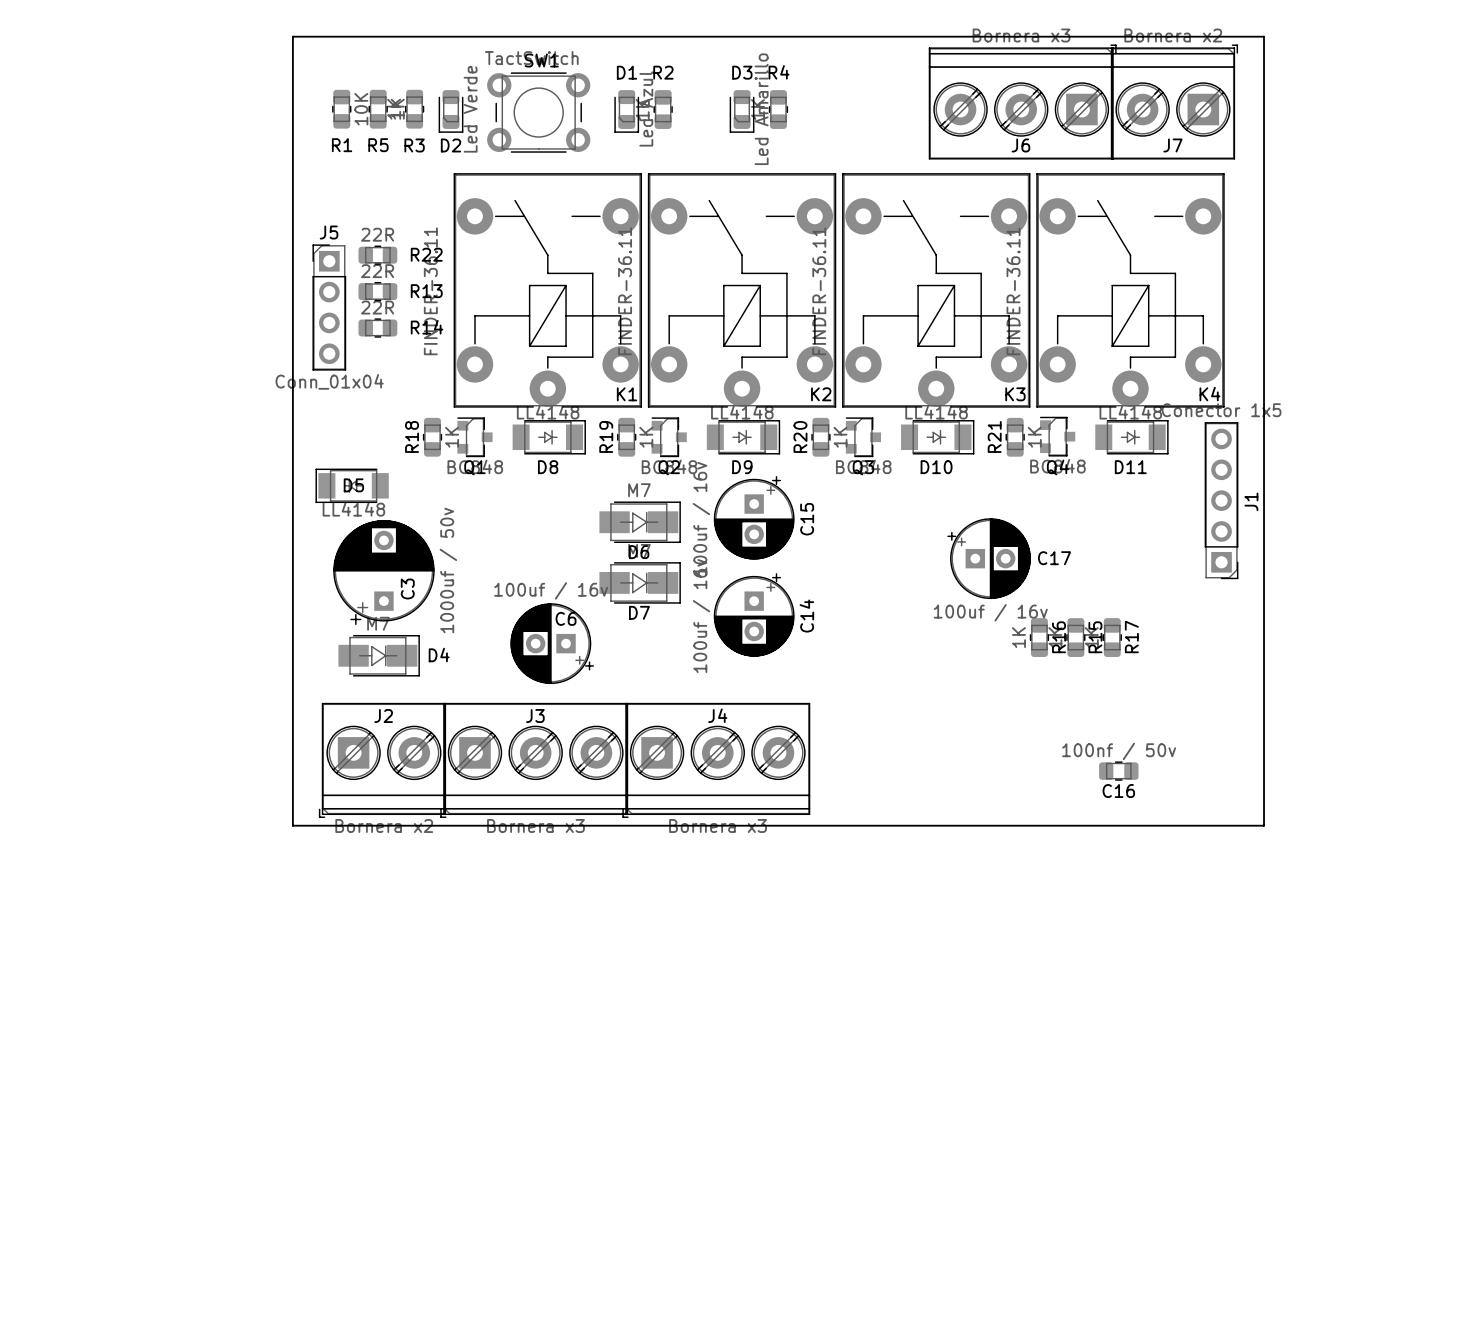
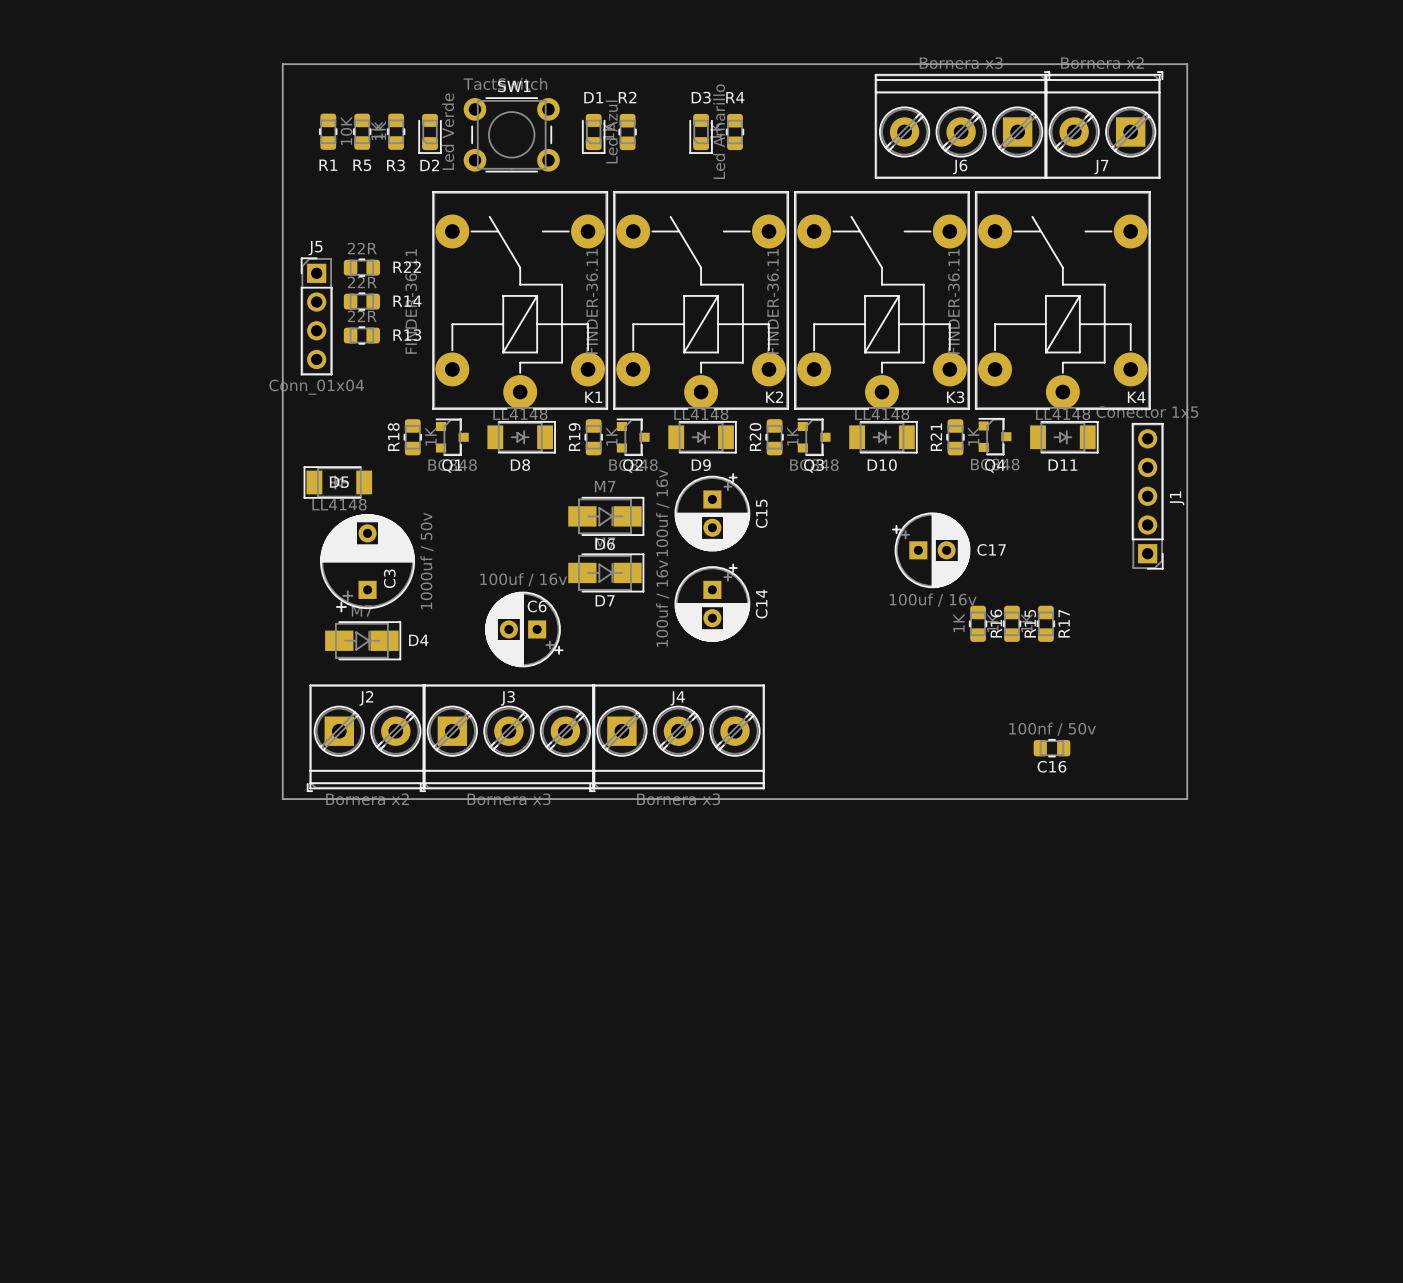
R13 name: R13 (426, 291) -> R14 (407, 301)
R14 name: R14 (427, 327) -> R13 (407, 335)

